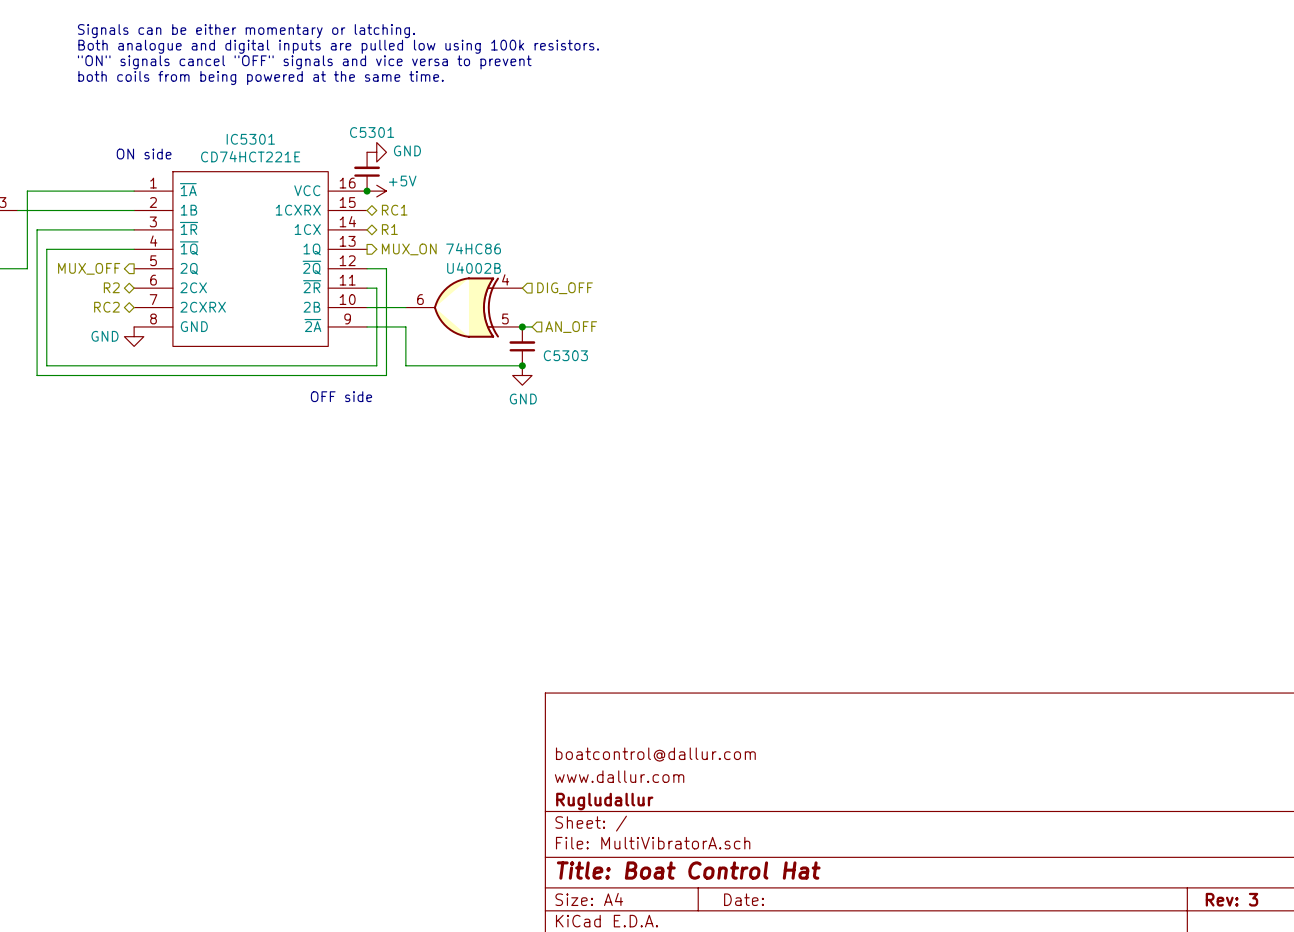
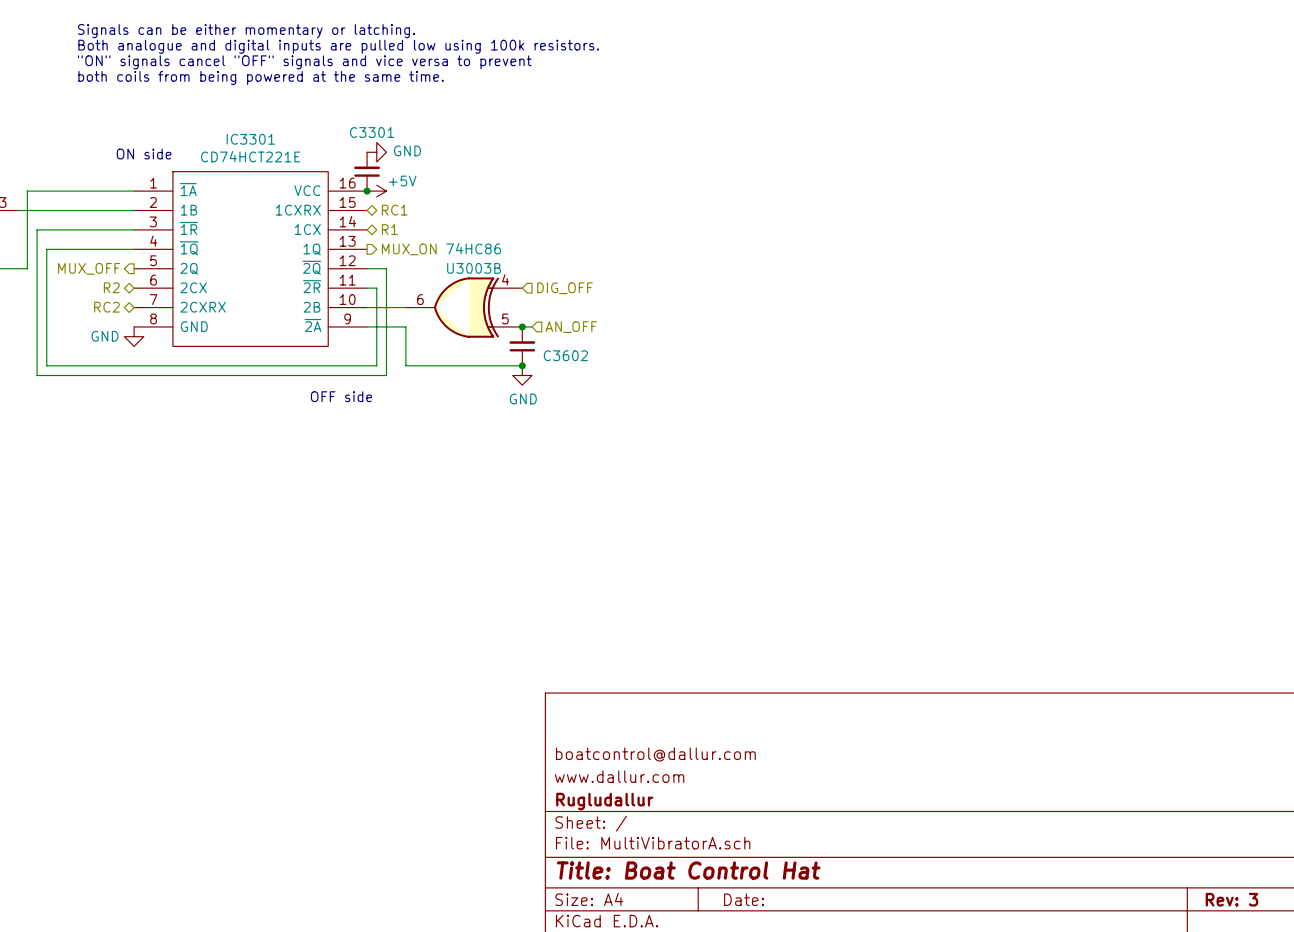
C5301 name: C5301 (372, 132) -> C3301 (372, 132)
IC5301 name: IC5301 (250, 139) -> IC3301 (250, 139)
U4002B name: U4002B (474, 268) -> U3003B (474, 268)
C5303 name: C5303 (565, 355) -> C3602 (565, 355)

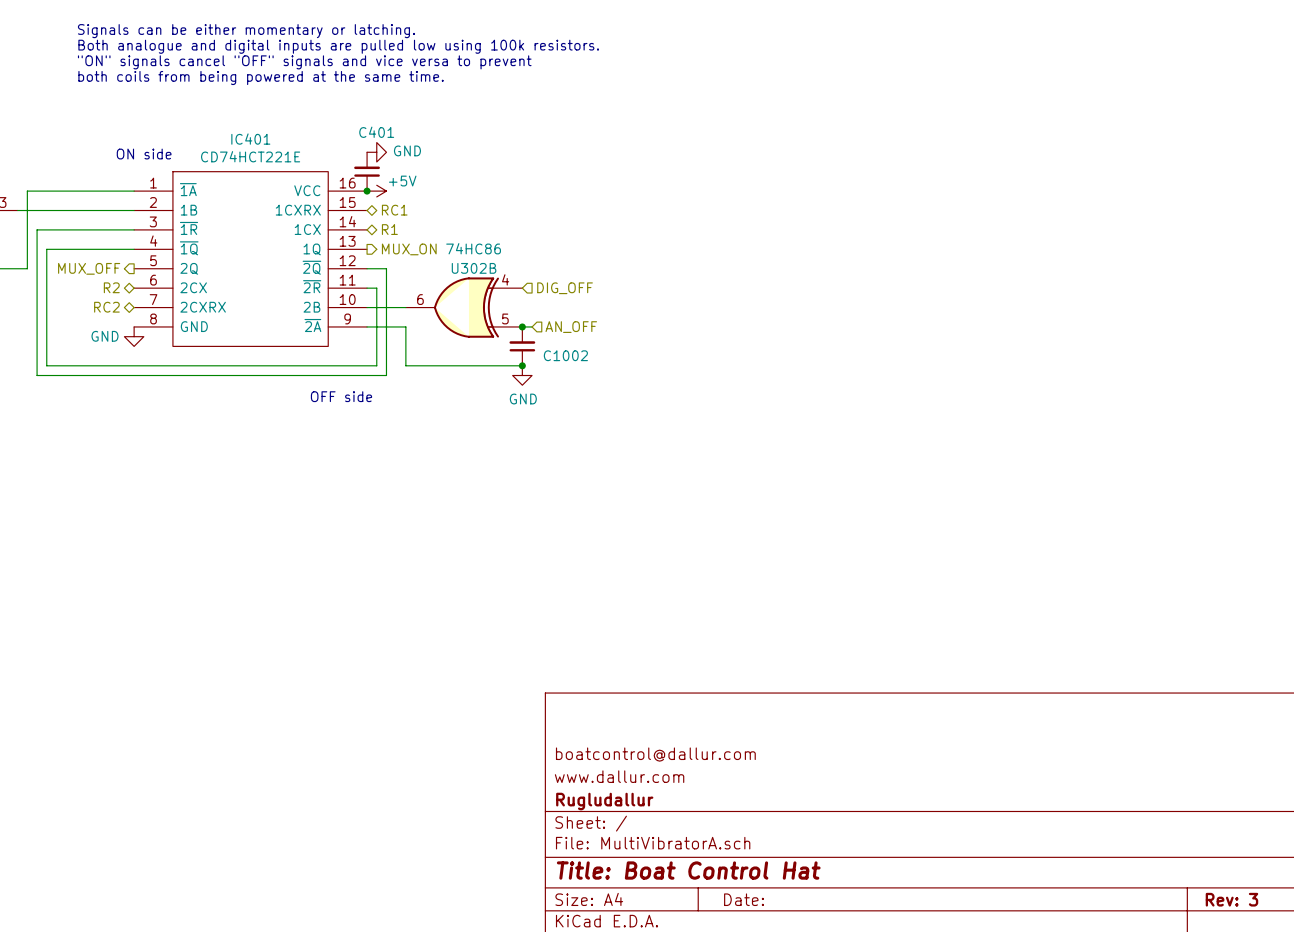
C3301 name: C3301 (372, 132) -> C401 (376, 132)
IC3301 name: IC3301 (250, 139) -> IC401 (250, 139)
U3003B name: U3003B (474, 268) -> U302B (474, 268)
C3602 name: C3602 (565, 355) -> C1002 (565, 355)

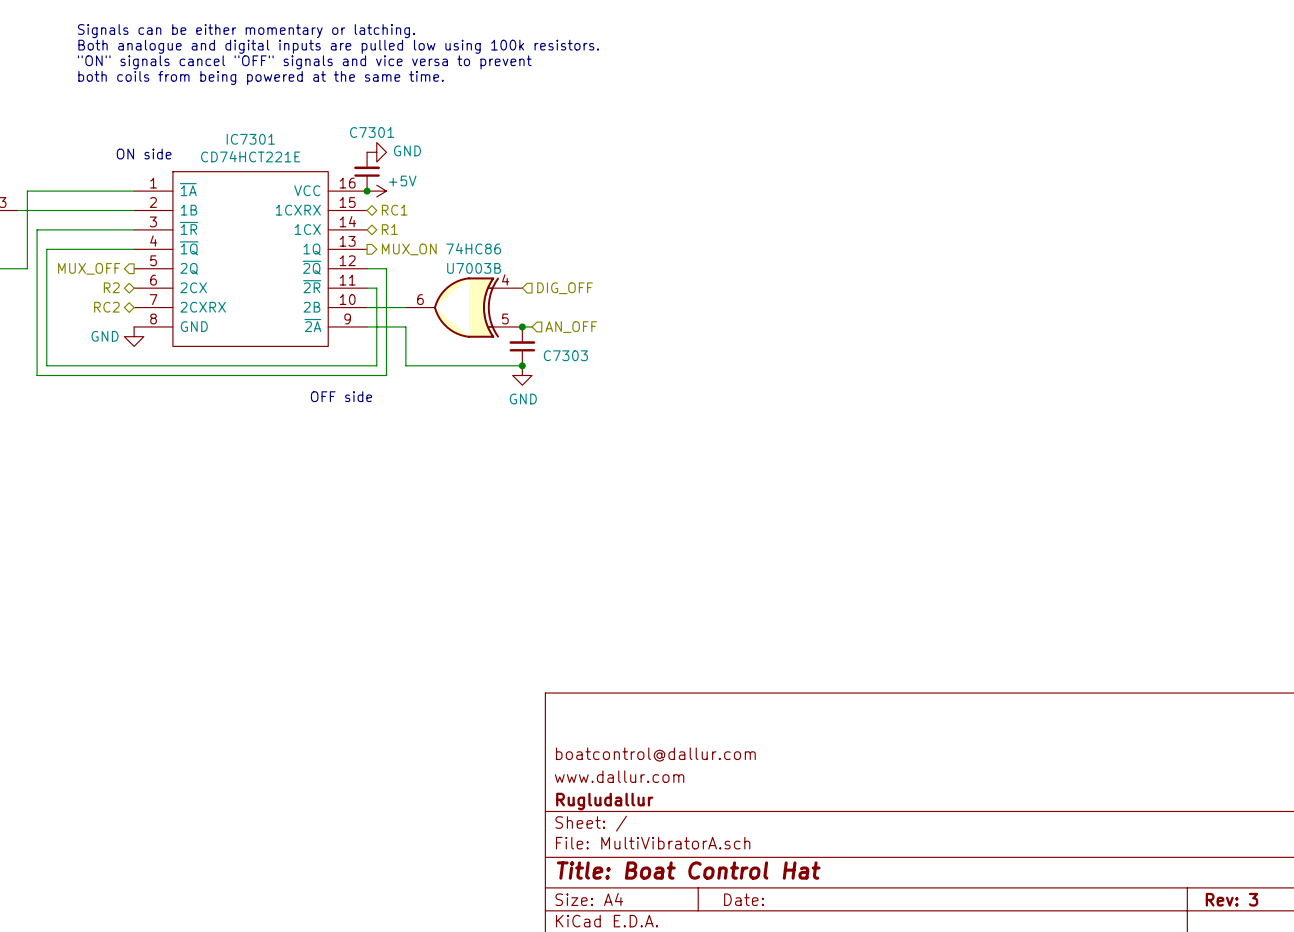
C401 name: C401 (376, 132) -> C7301 (372, 132)
IC401 name: IC401 (250, 139) -> IC7301 (250, 139)
U302B name: U302B (474, 268) -> U7003B (474, 268)
C1002 name: C1002 (565, 355) -> C7303 (565, 355)

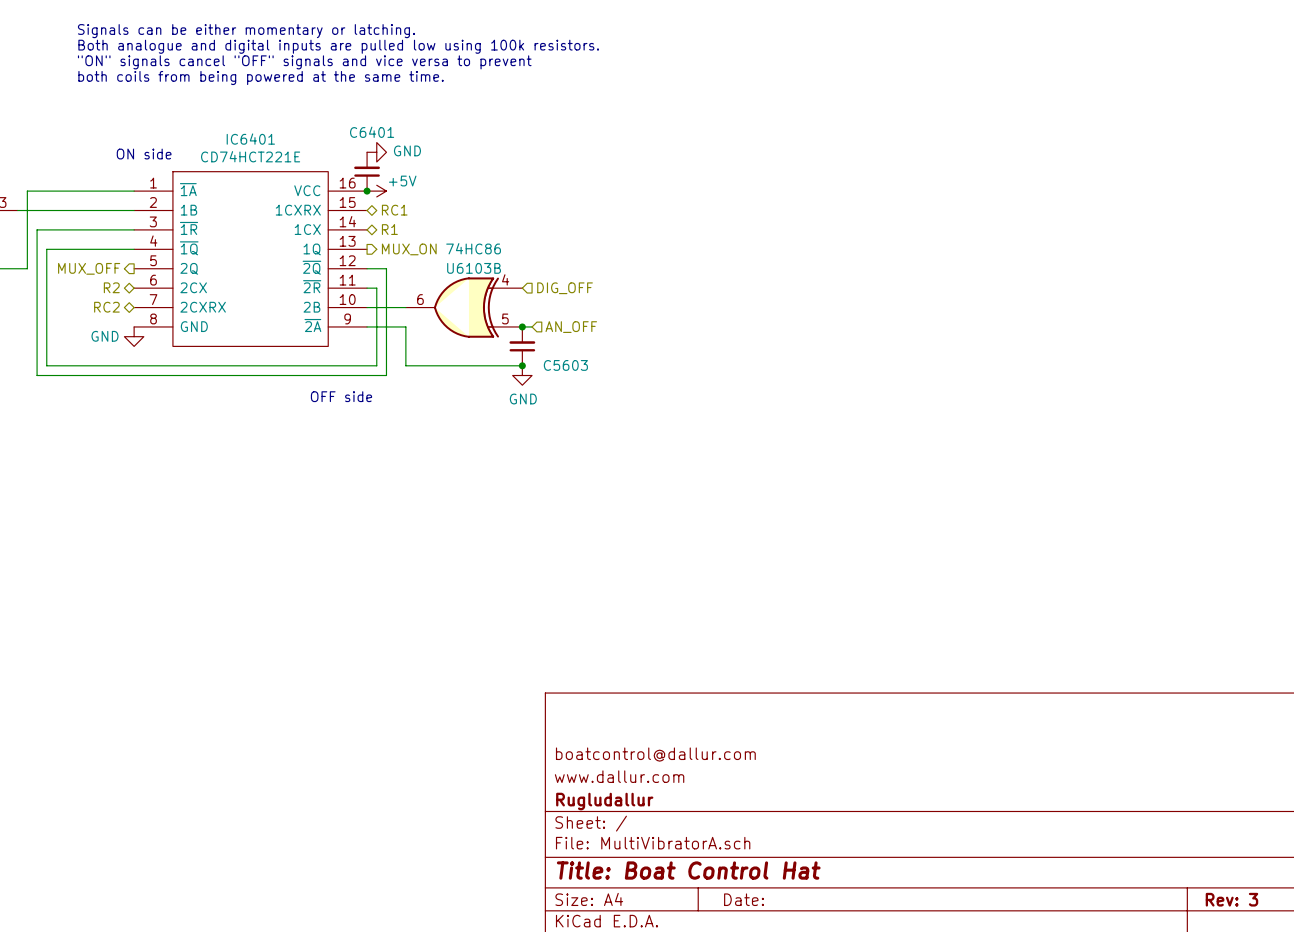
C7301 name: C7301 (372, 132) -> C6401 (372, 132)
IC7301 name: IC7301 (250, 139) -> IC6401 (250, 139)
U7003B name: U7003B (474, 268) -> U6103B (474, 268)
C7303 name: C7303 (565, 355) -> C5603 (565, 365)

